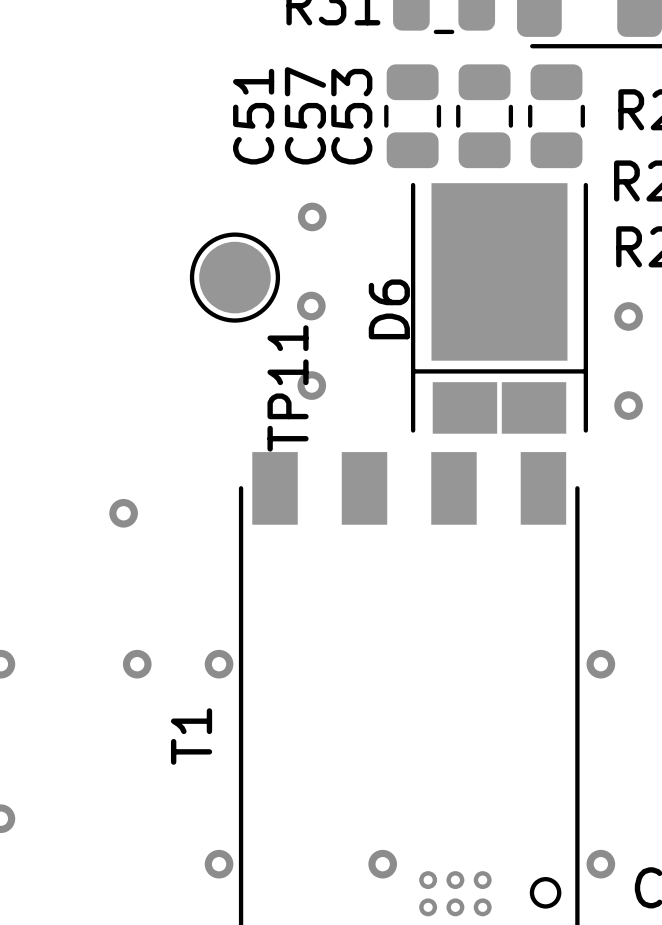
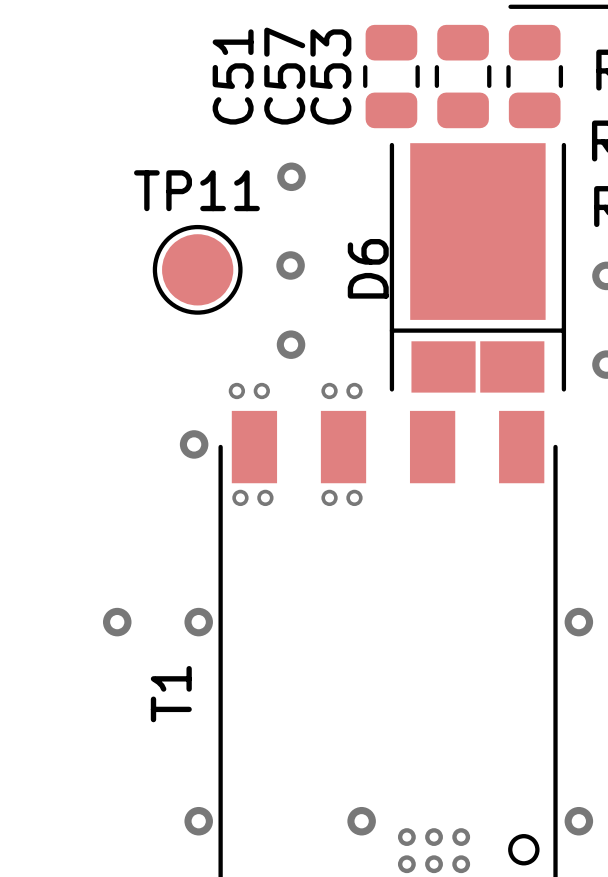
TP11 position: (234, 277) -> (197, 269)
TP11 name rotation: 0° (288, 388) -> 90° clockwise (196, 190)
TP11 name position: TP11 (288, 388) -> TP11 (196, 190)
via: none -> (236, 390)
via: none -> (261, 390)
via: none -> (329, 390)
via: none -> (354, 390)
via position: (123, 513) -> (194, 444)
via: none -> (240, 497)
via: none -> (265, 497)
via: none -> (329, 497)
via: none -> (354, 497)

